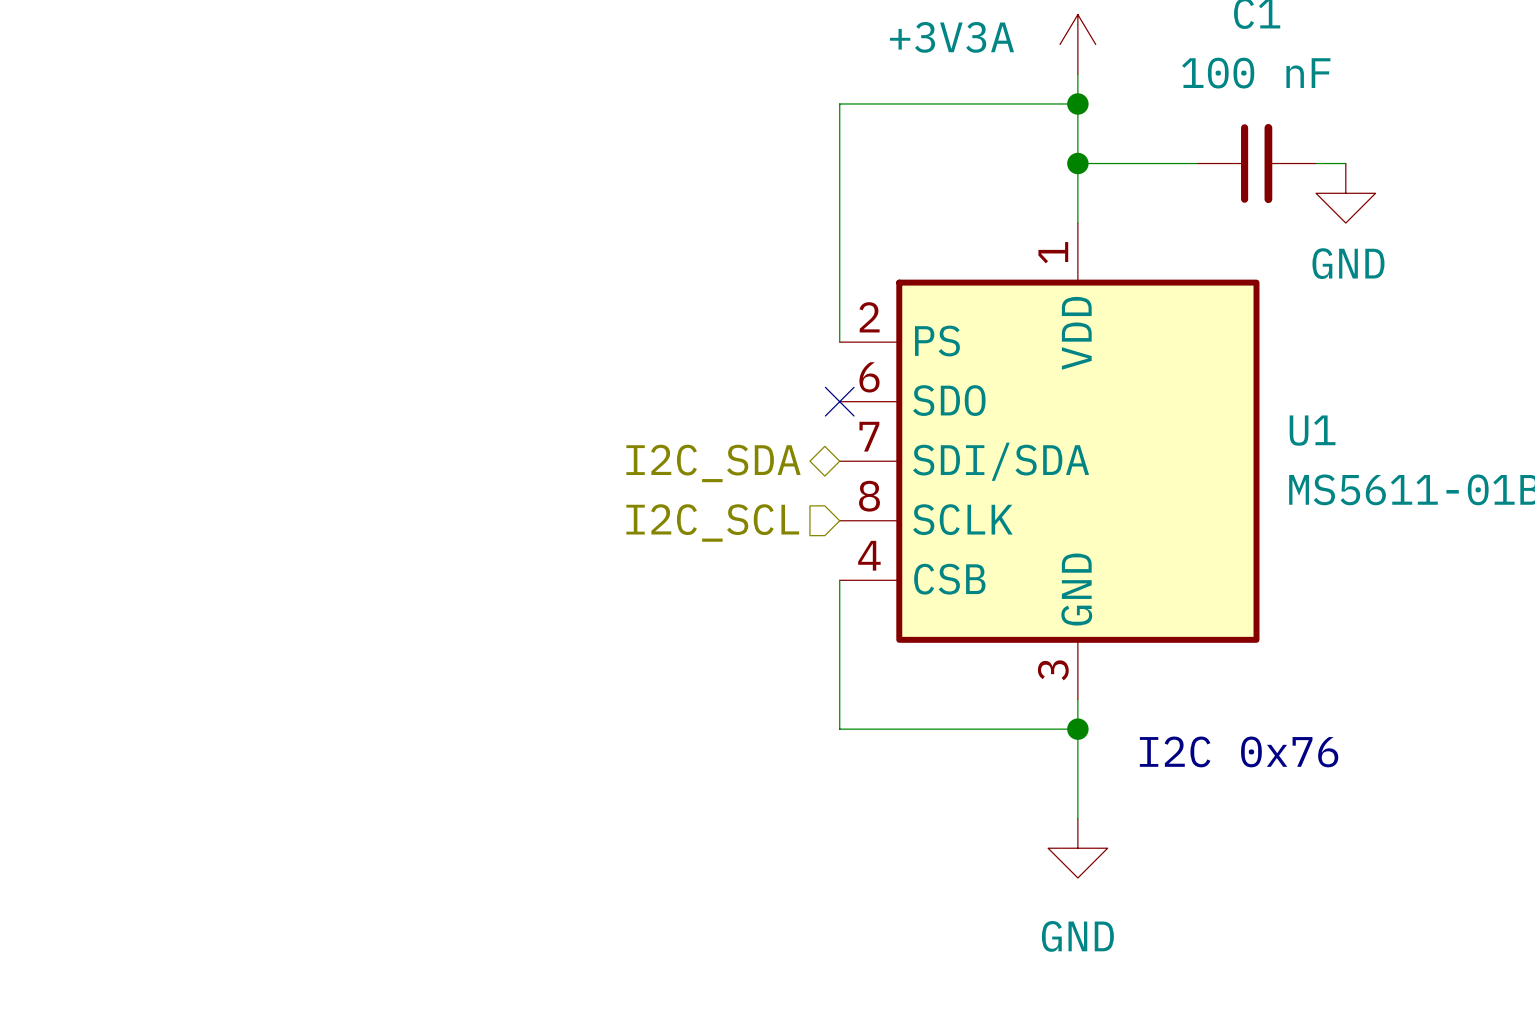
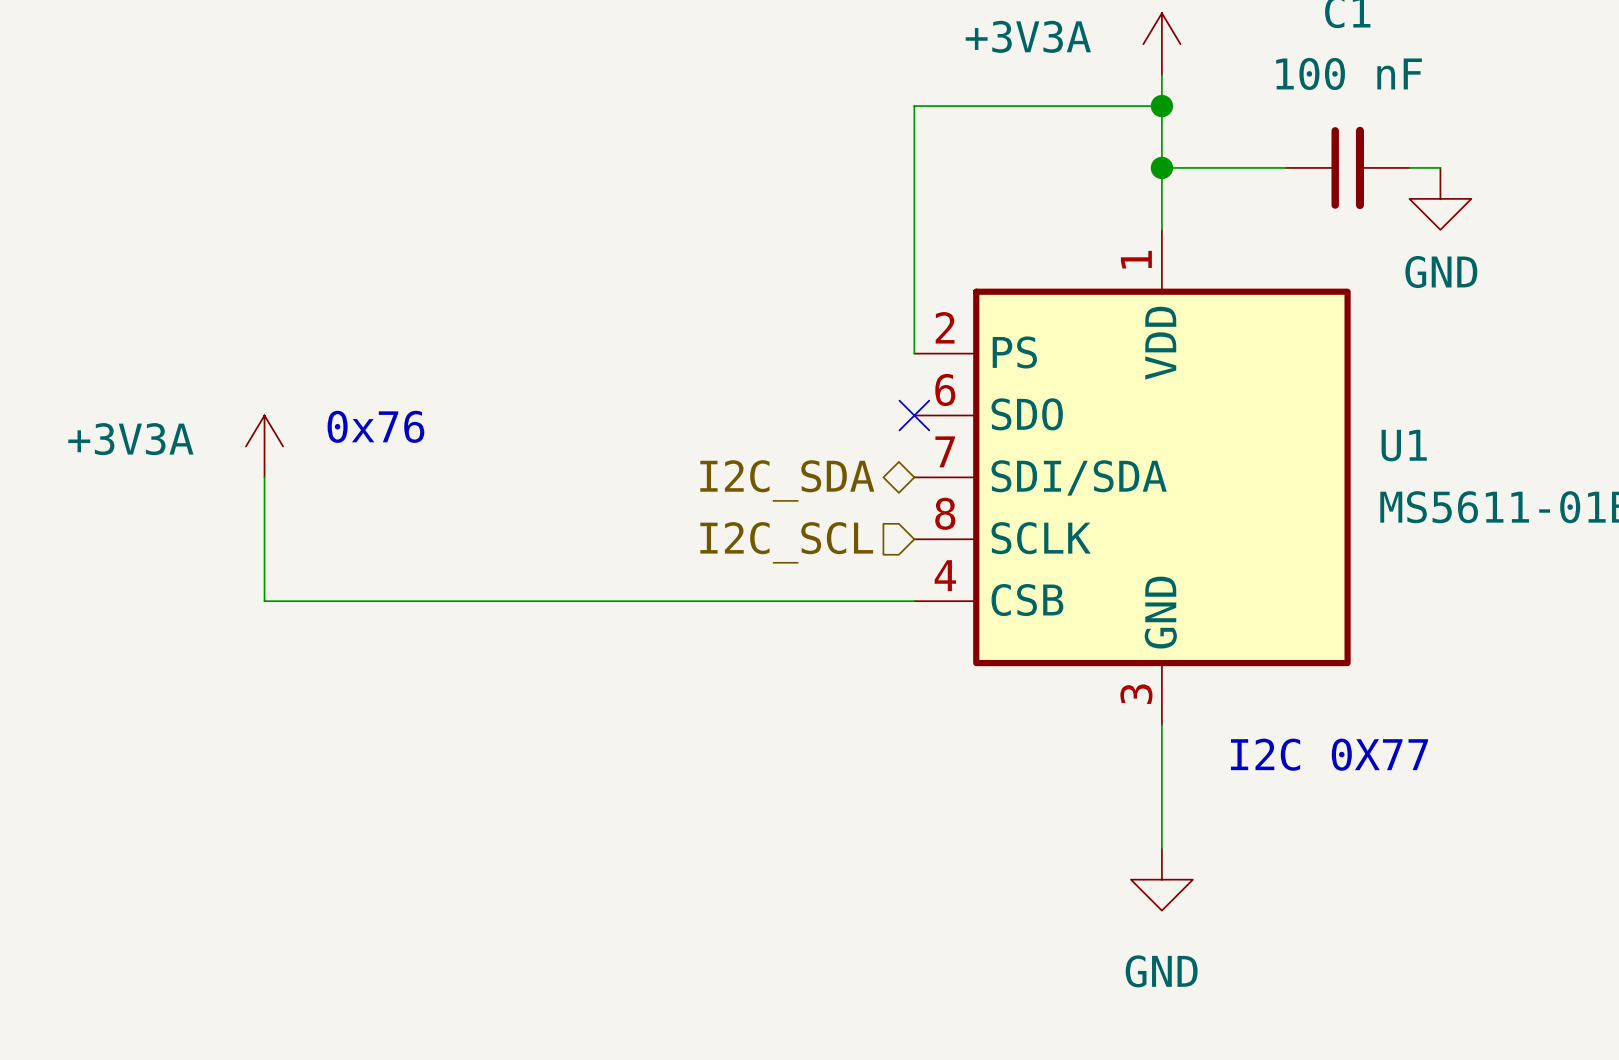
text: none -> 0x76 (375, 426)
power symbol: none -> +3V3A (264, 446)
wire: (839, 580) (839, 729) (1077, 729) -> (914, 601) (264, 601) (264, 477)
junction: (1077, 729) -> none
text: I2C 0x76 (1239, 751) -> I2C 0X77 (1329, 754)

